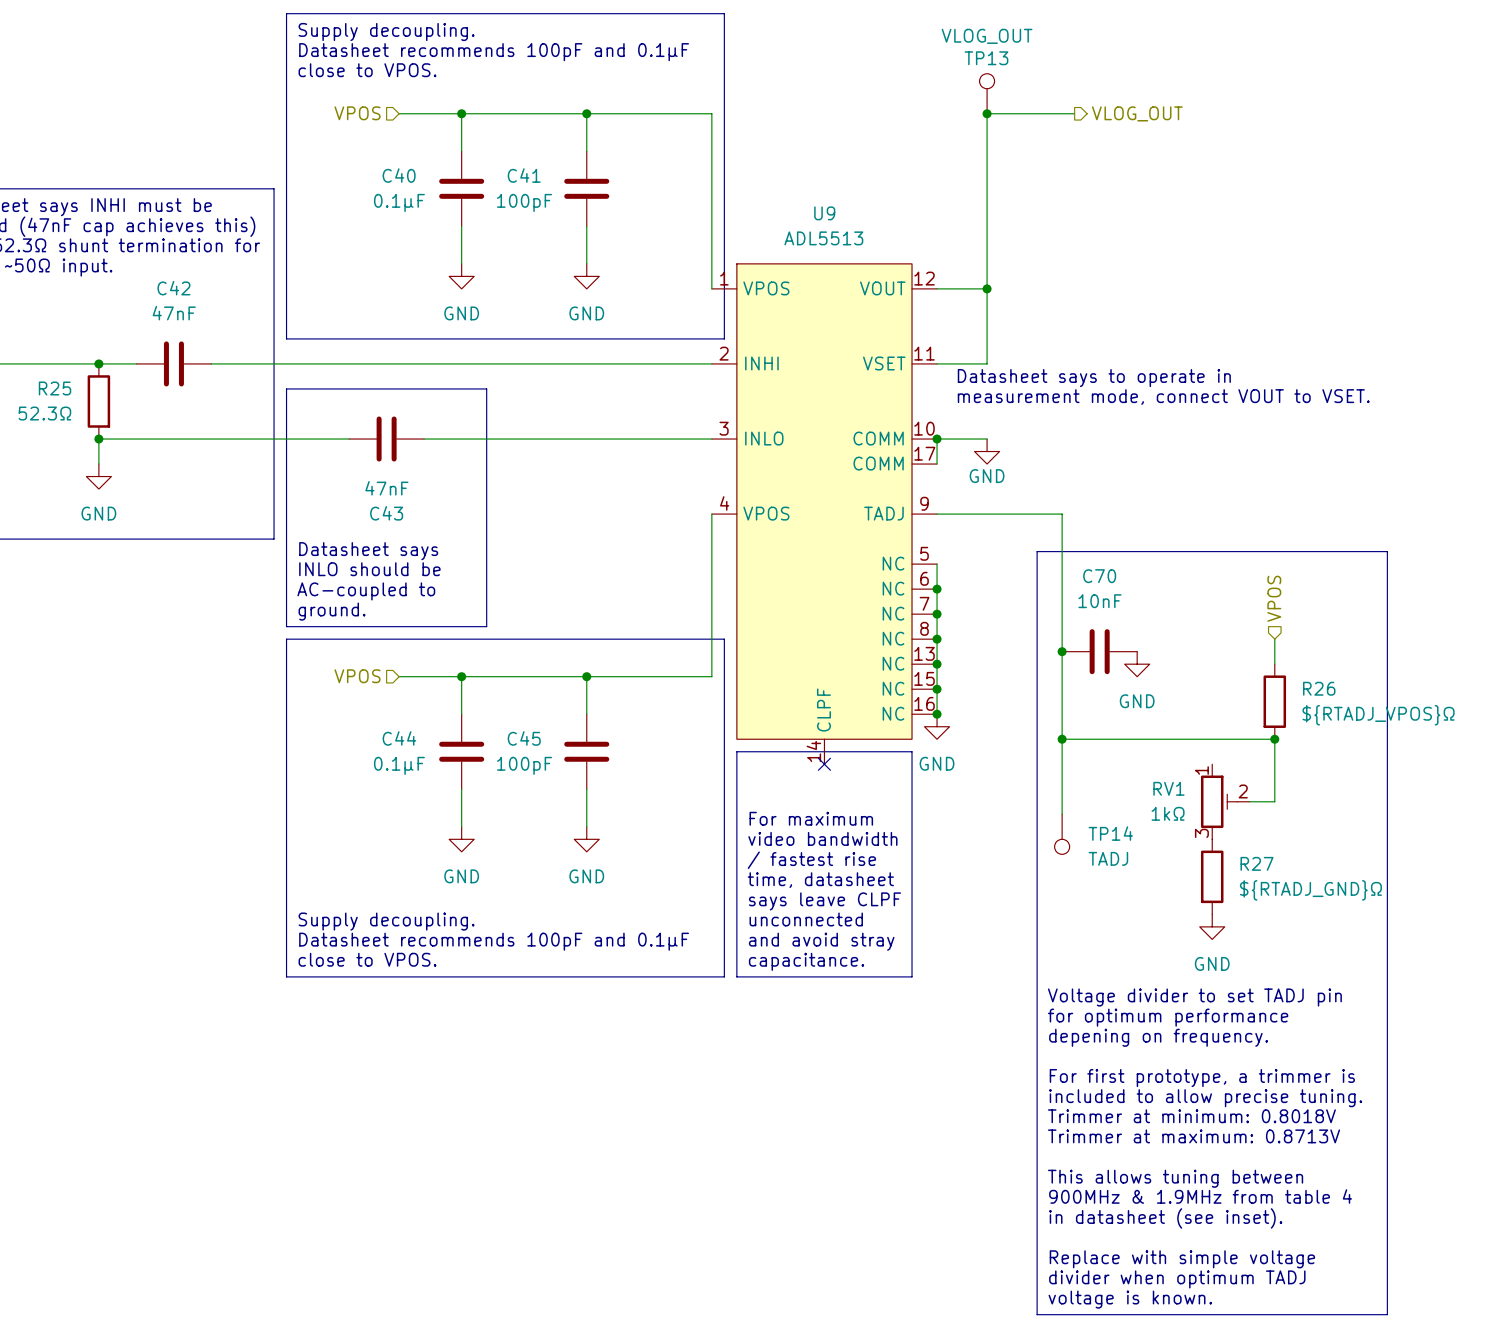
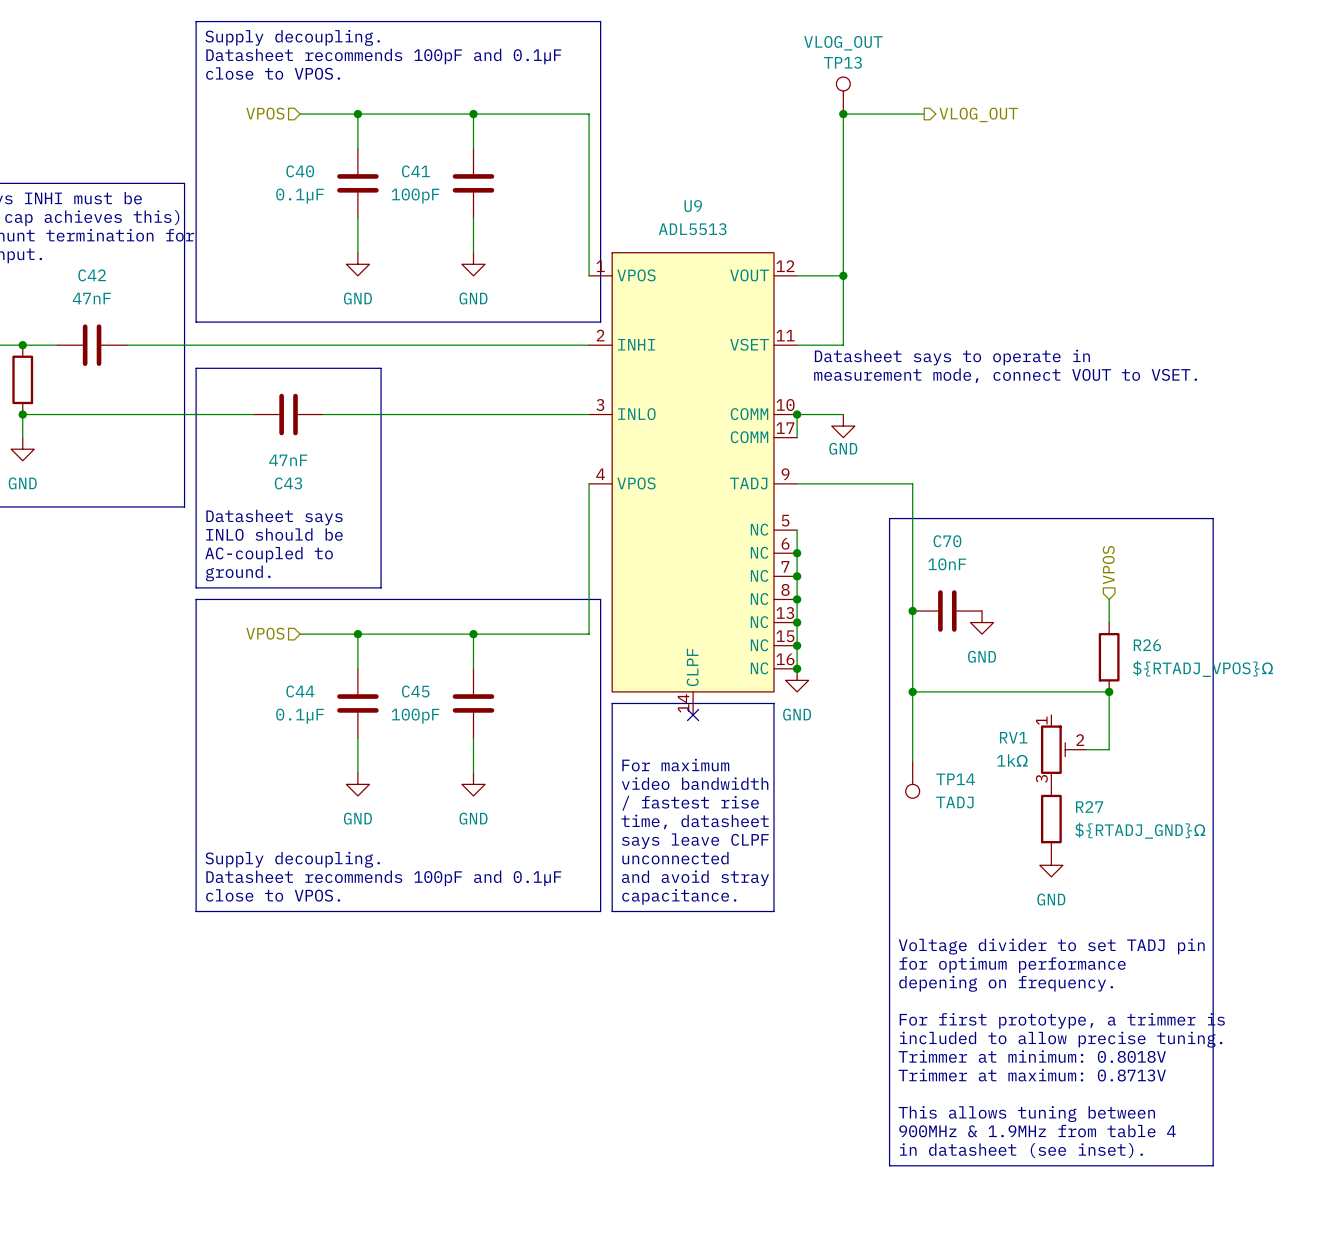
text position: Voltage divider to set TADJ pin (1194, 997) -> Voltage divider to set TADJ pin (1051, 946)
text position: for optimum performance (1168, 1017) -> for optimum performance (1012, 965)
text position: depening on frequency. (1158, 1037) -> depening on frequency. (1006, 983)
text position: For first prototype, a trimmer is (1202, 1078) -> For first prototype, a trimmer is (1062, 1020)
text position: included to allow precise tuning. (1205, 1098) -> included to allow precise tuning. (1061, 1039)
text position: Trimmer at minimum: 0.8018V (1191, 1116) -> Trimmer at minimum: 0.8018V (1032, 1056)
text position: Trimmer at maximum: 0.8713V (1194, 1136) -> Trimmer at maximum: 0.8713V (1032, 1075)
text position: This allows tuning between (1175, 1178) -> This allows tuning between (1026, 1114)
text position: 900MHz & 1.9MHz from table 4 (1200, 1196) -> 900MHz & 1.9MHz from table 4 (1037, 1131)
text position: in datasheet (see inset). (1165, 1218) -> in datasheet (see inset). (1021, 1150)
line: (1037, 1252) (1037, 1314) (1387, 1314) (1387, 1252) -> (889, 1165) (1213, 1165)
text: Replace with simple voltage (1182, 1259) -> none
text: divider when optimum TADJ (1177, 1279) -> none
text: voltage is known. (1130, 1299) -> none

